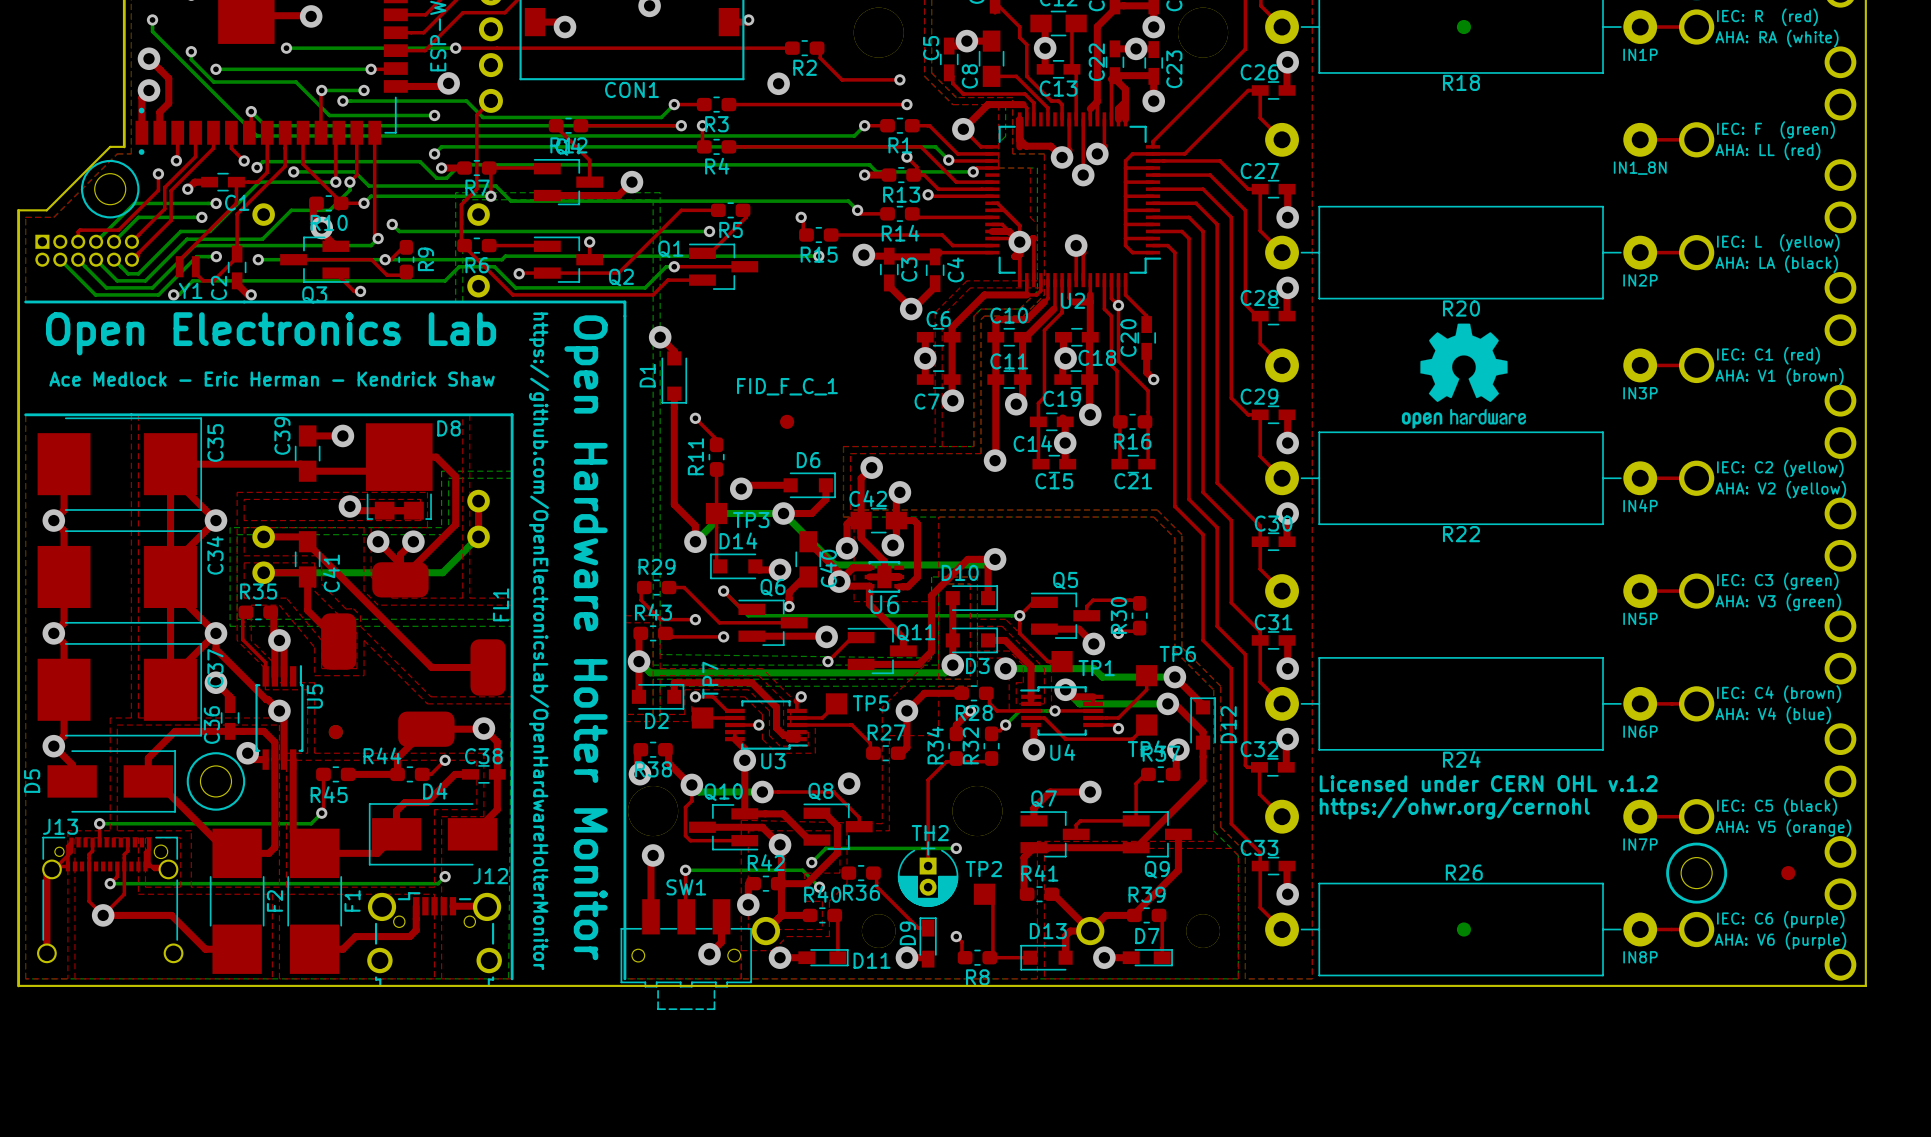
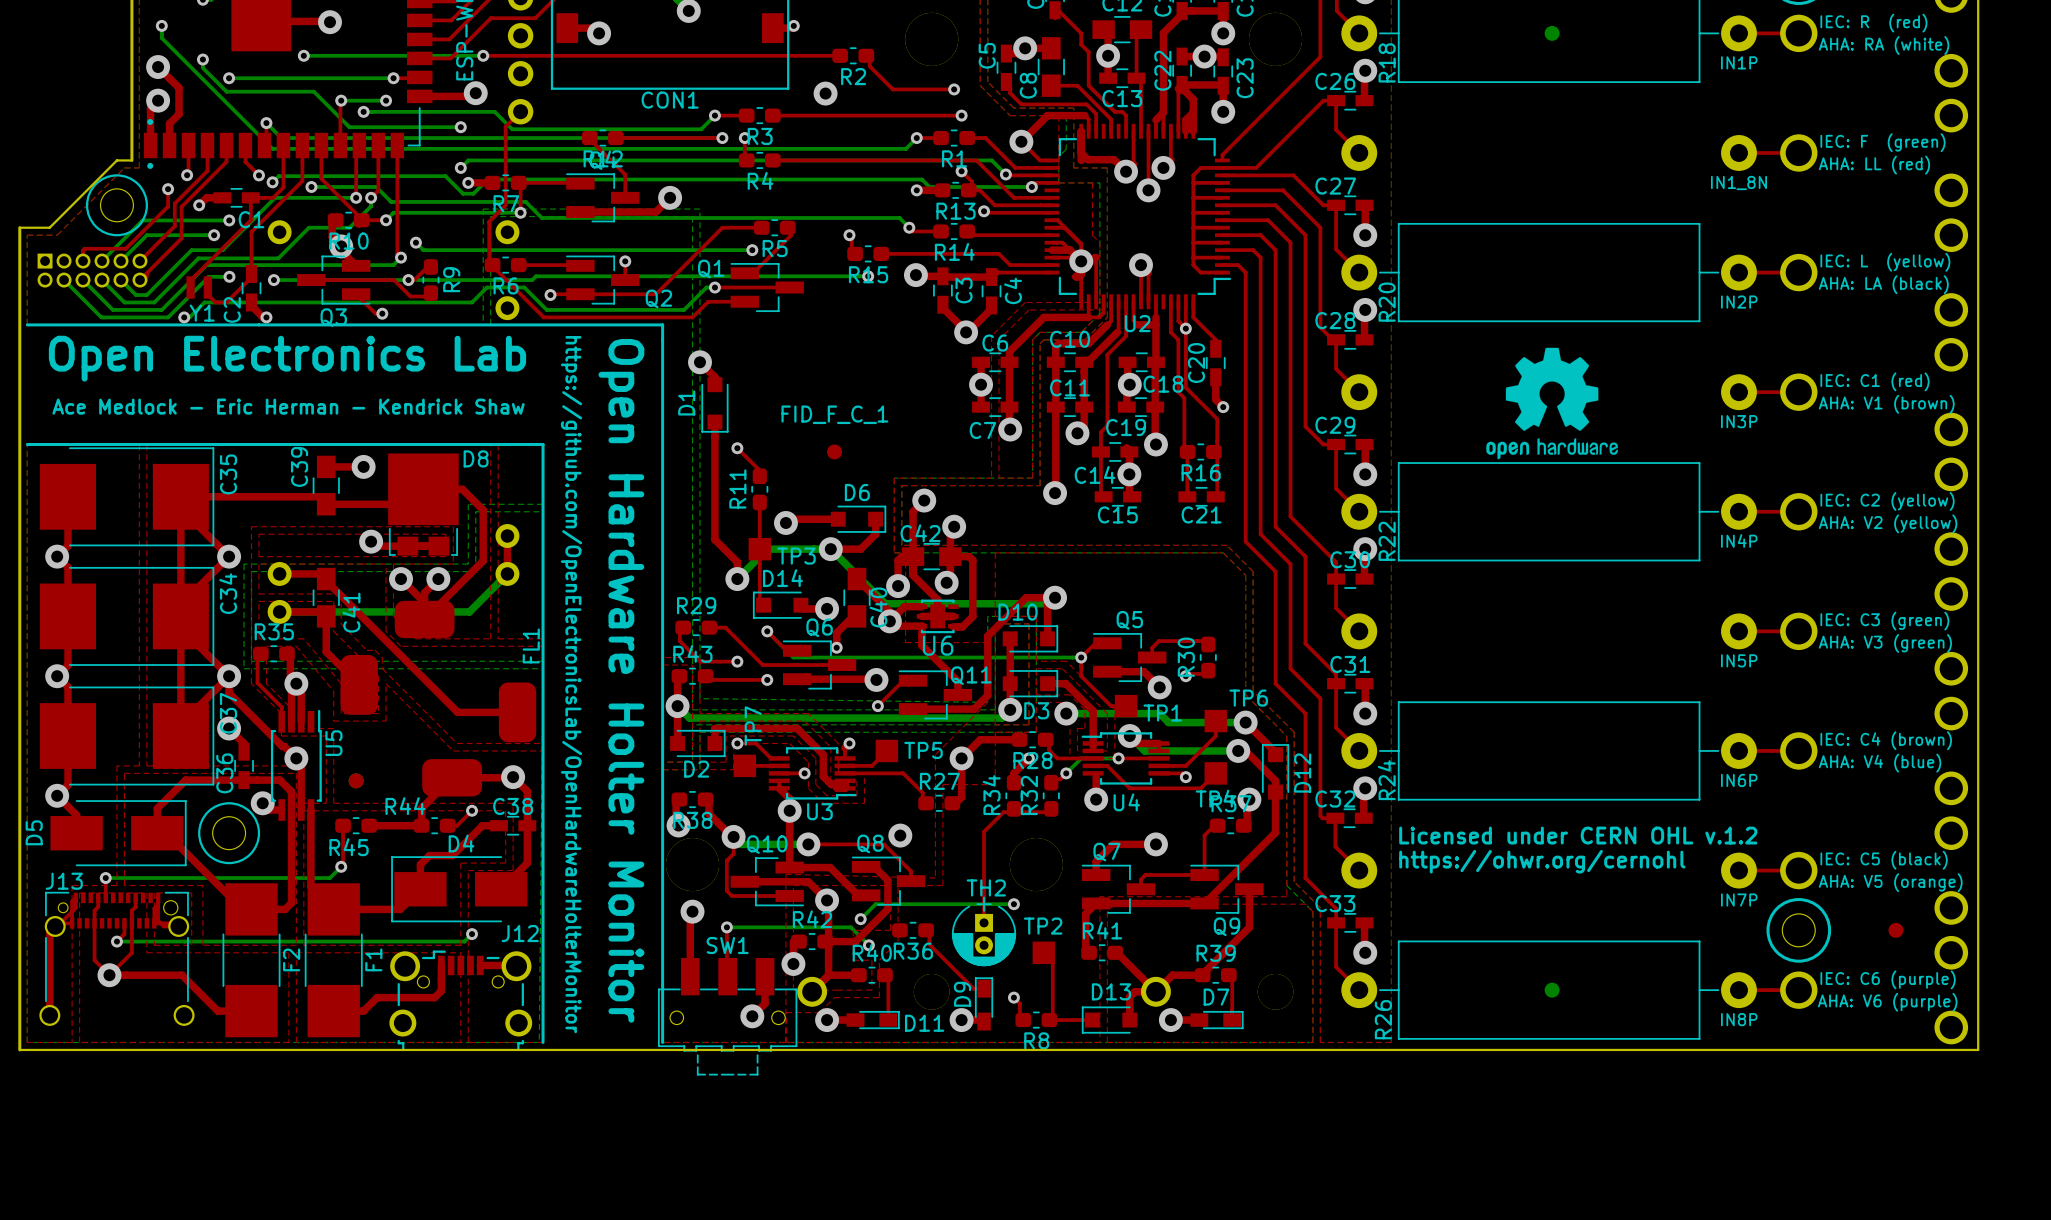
R18 name rotation: 0° (1461, 82) -> 90° counterclockwise (1387, 62)
R18 name position: R18 (1461, 82) -> R18 (1387, 62)
R20 name rotation: 0° (1461, 308) -> 90° counterclockwise (1387, 302)
R20 name position: R20 (1461, 308) -> R20 (1387, 302)
R22 name rotation: 0° (1461, 534) -> 90° counterclockwise (1387, 541)
R22 name position: R22 (1461, 534) -> R22 (1387, 541)
R24 name rotation: 0° (1461, 759) -> 90° counterclockwise (1386, 780)
R24 name position: R24 (1461, 759) -> R24 (1386, 780)
R26 name rotation: 0° (1464, 872) -> 90° counterclockwise (1383, 1019)
R26 name position: R26 (1464, 872) -> R26 (1383, 1019)

